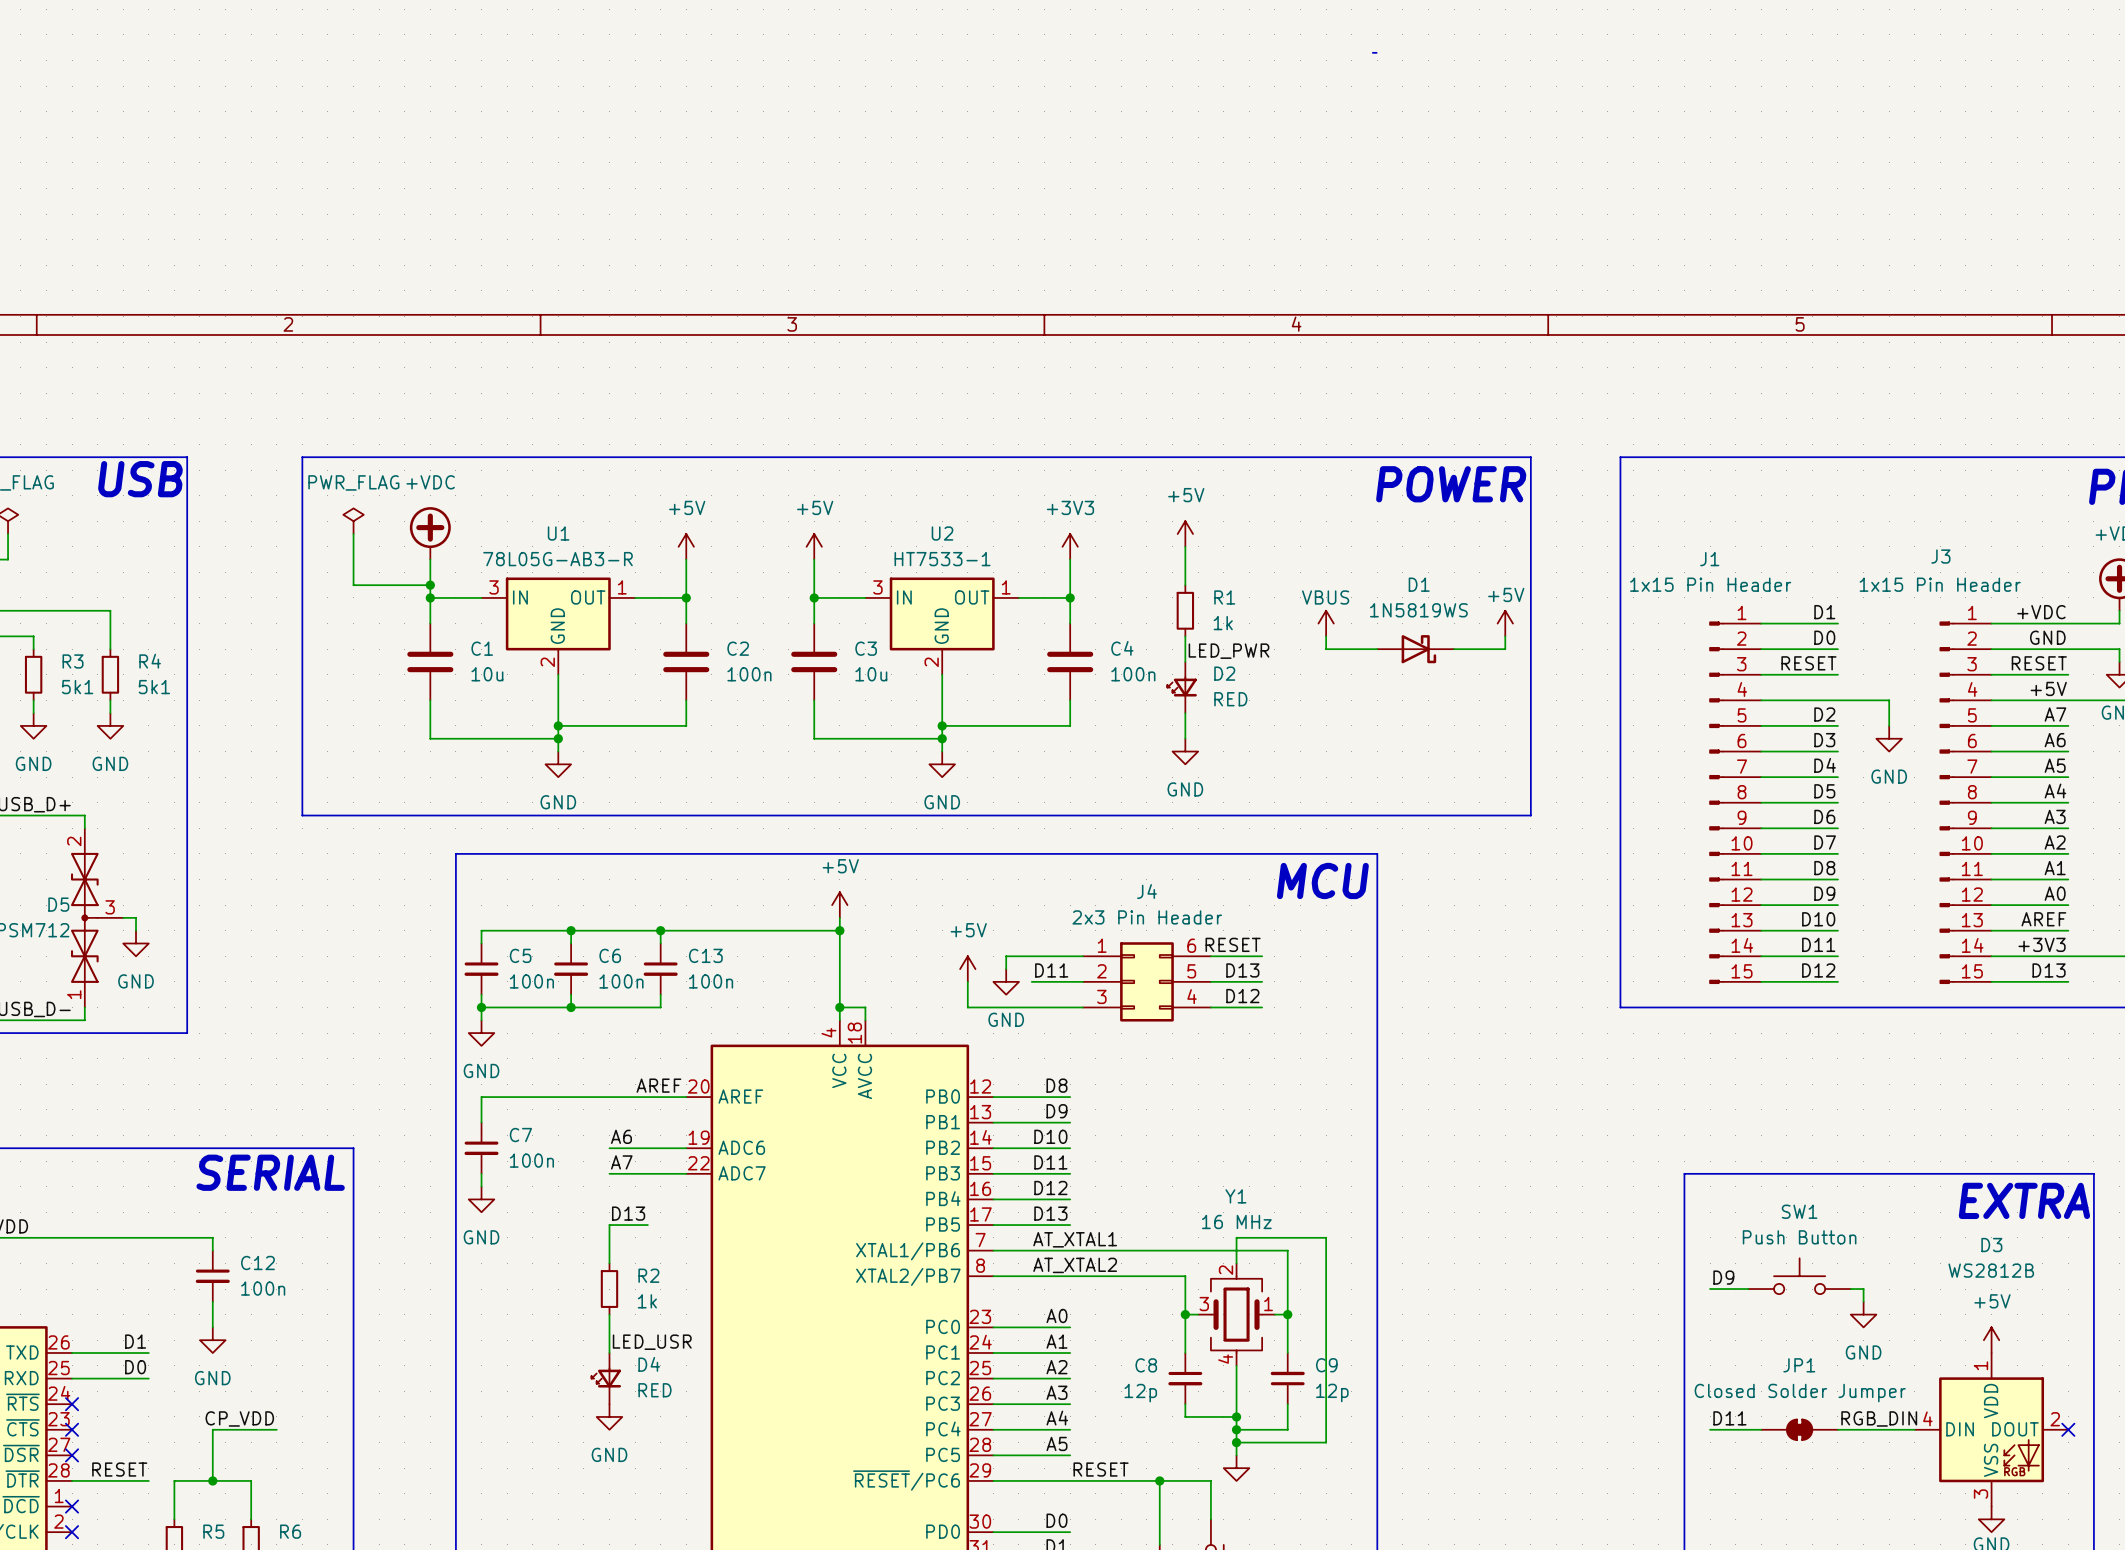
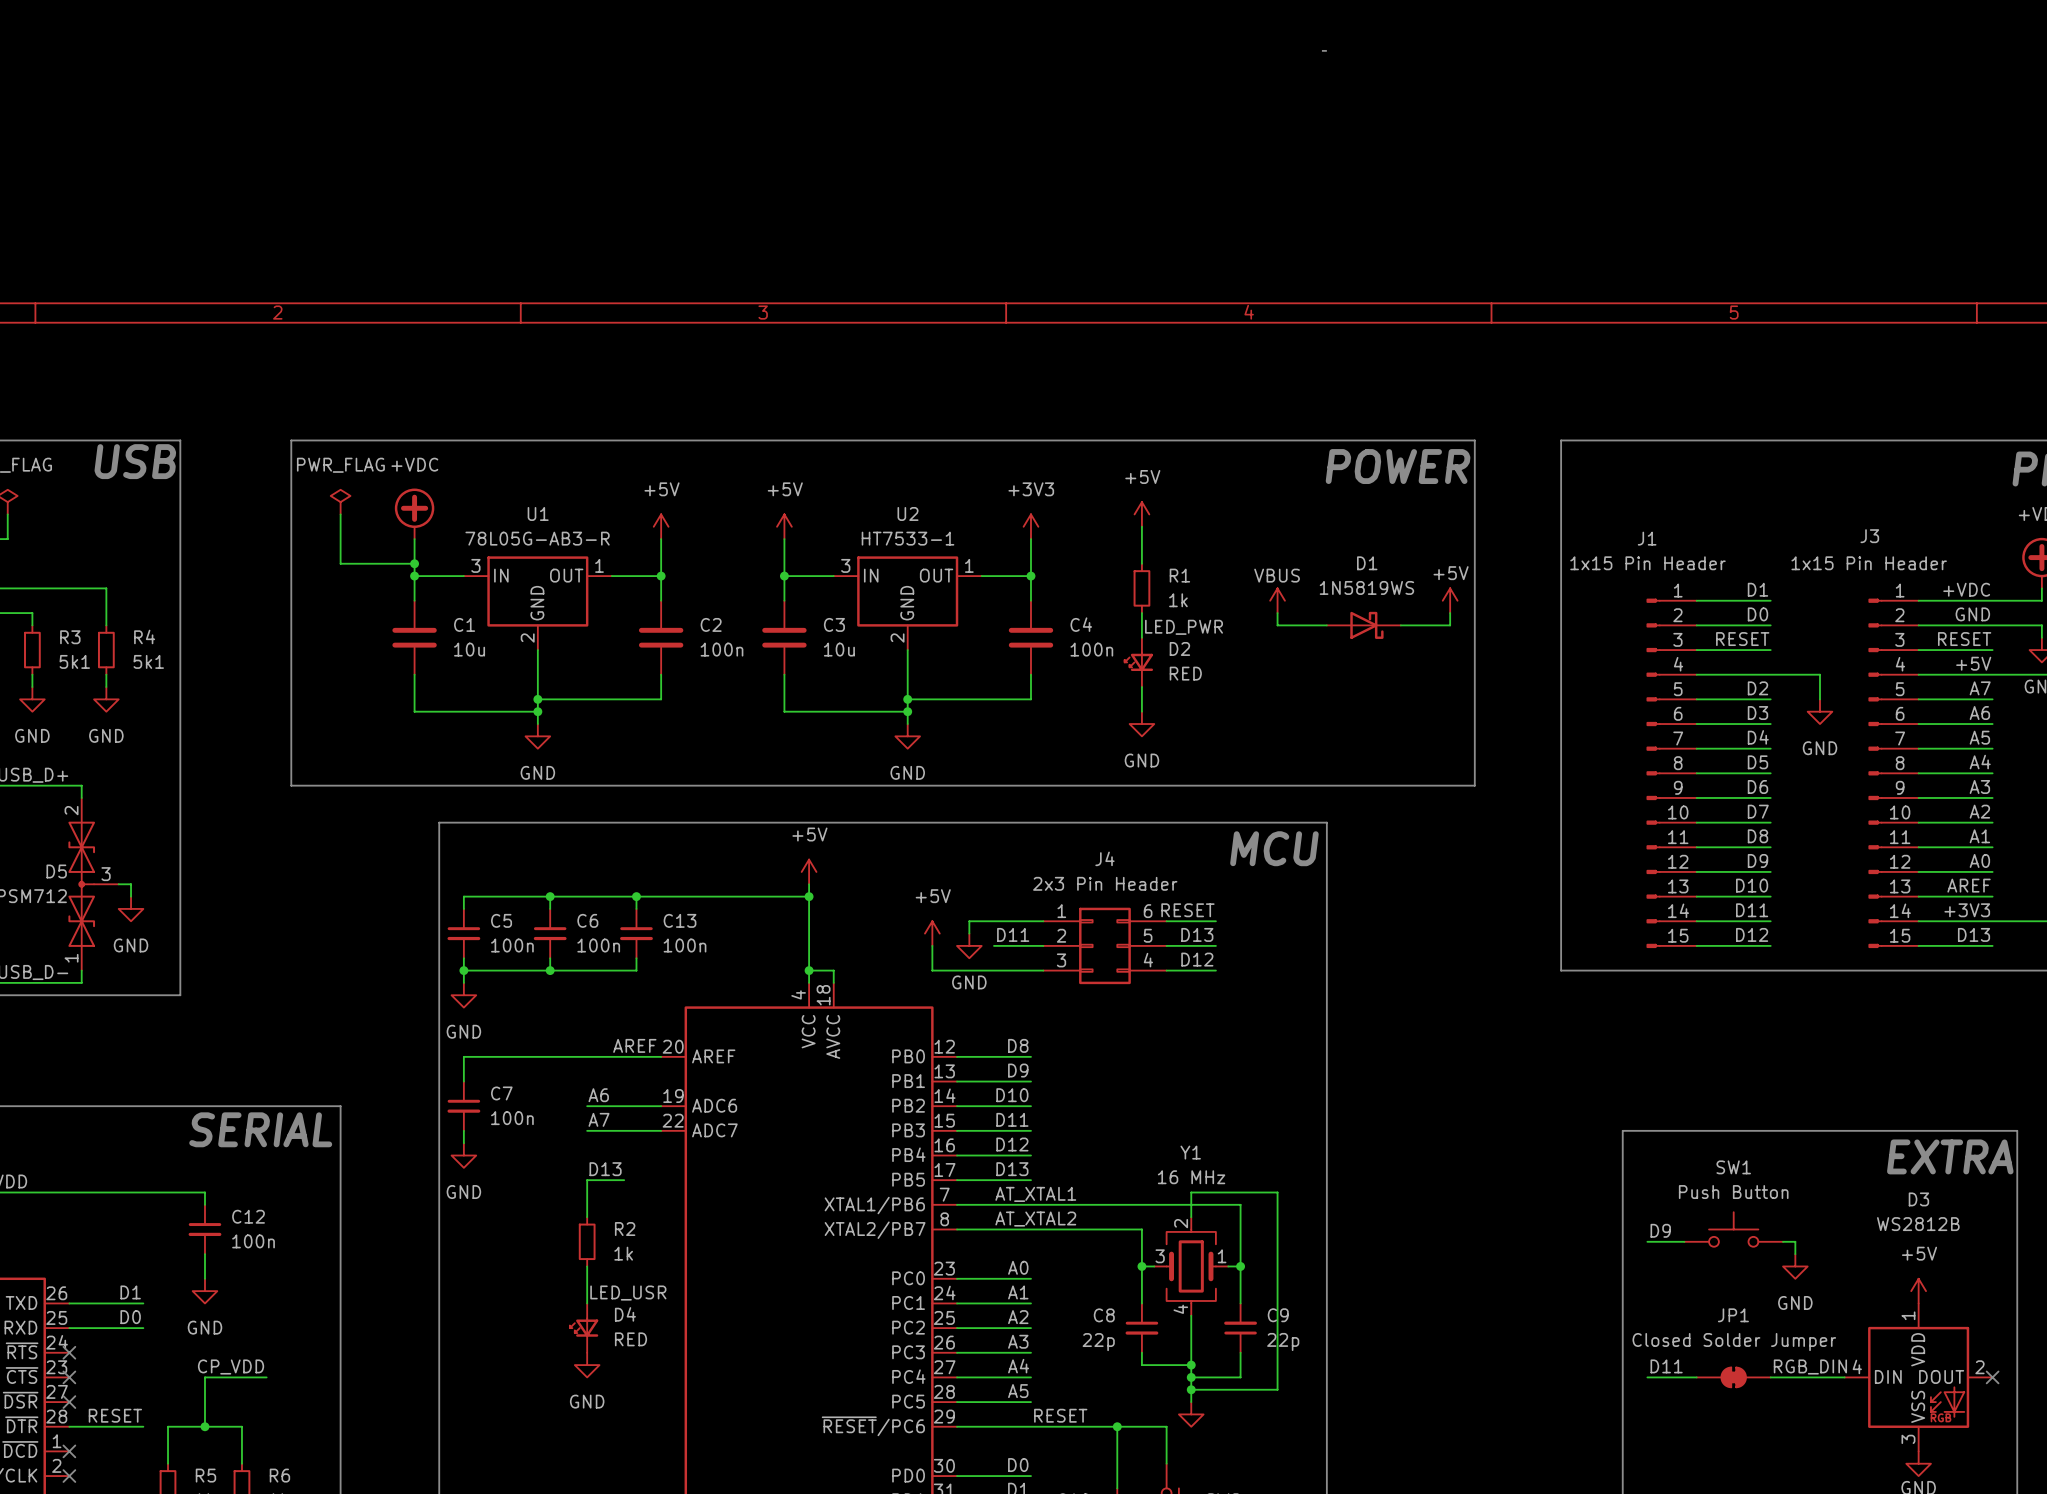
C9 value: 12p (1332, 1392) -> 22p (1283, 1341)
C8 value: 12p (1140, 1393) -> 22p (1098, 1342)

